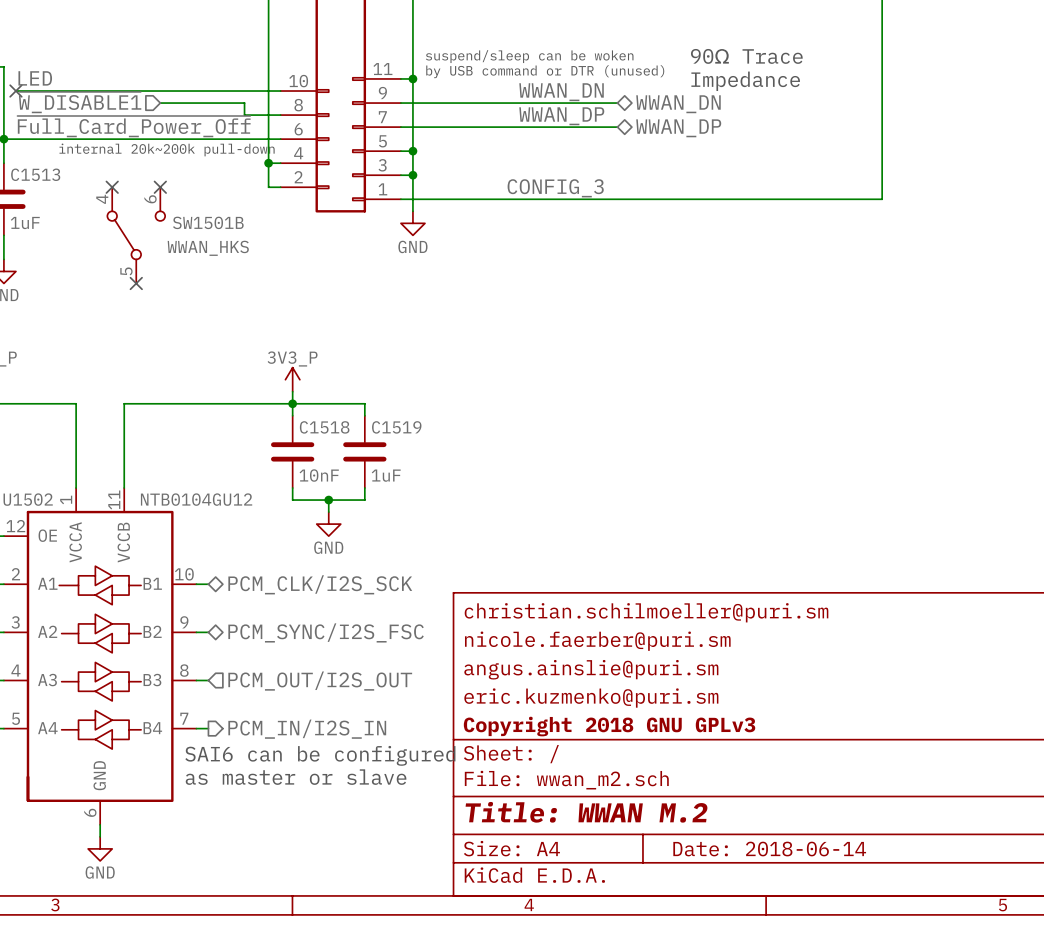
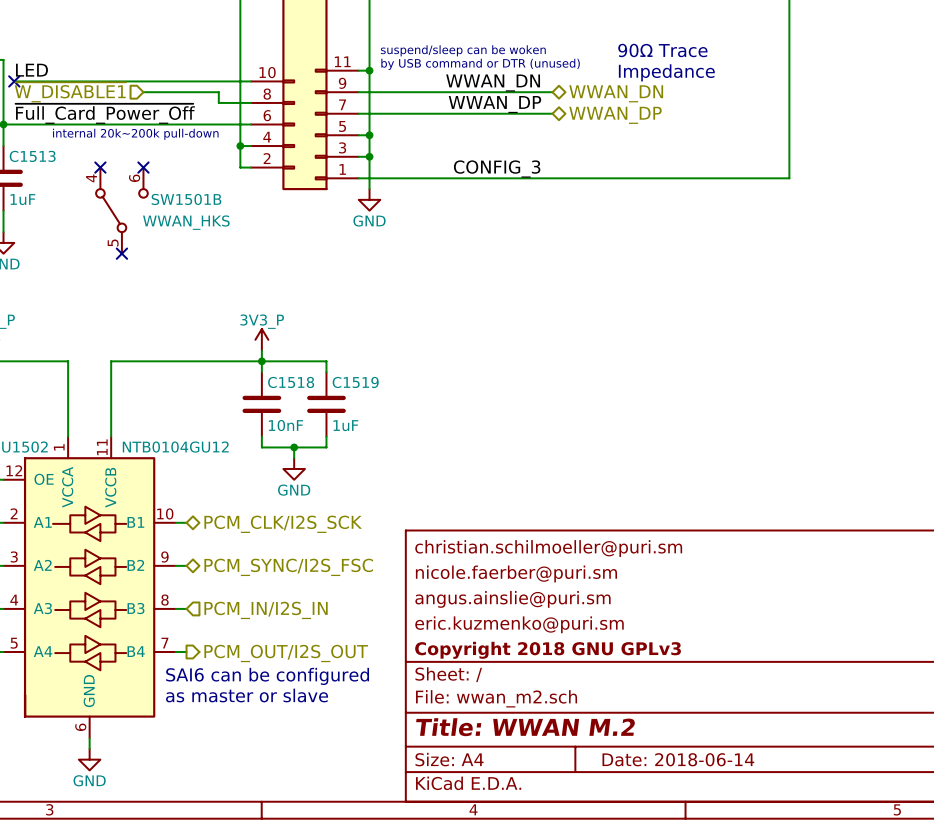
hierarchical label: PCM_OUT/I2S_OUT (320, 681) -> PCM_IN/I2S_IN (266, 610)
hierarchical label: PCM_IN/I2S_IN (307, 729) -> PCM_OUT/I2S_OUT (286, 653)

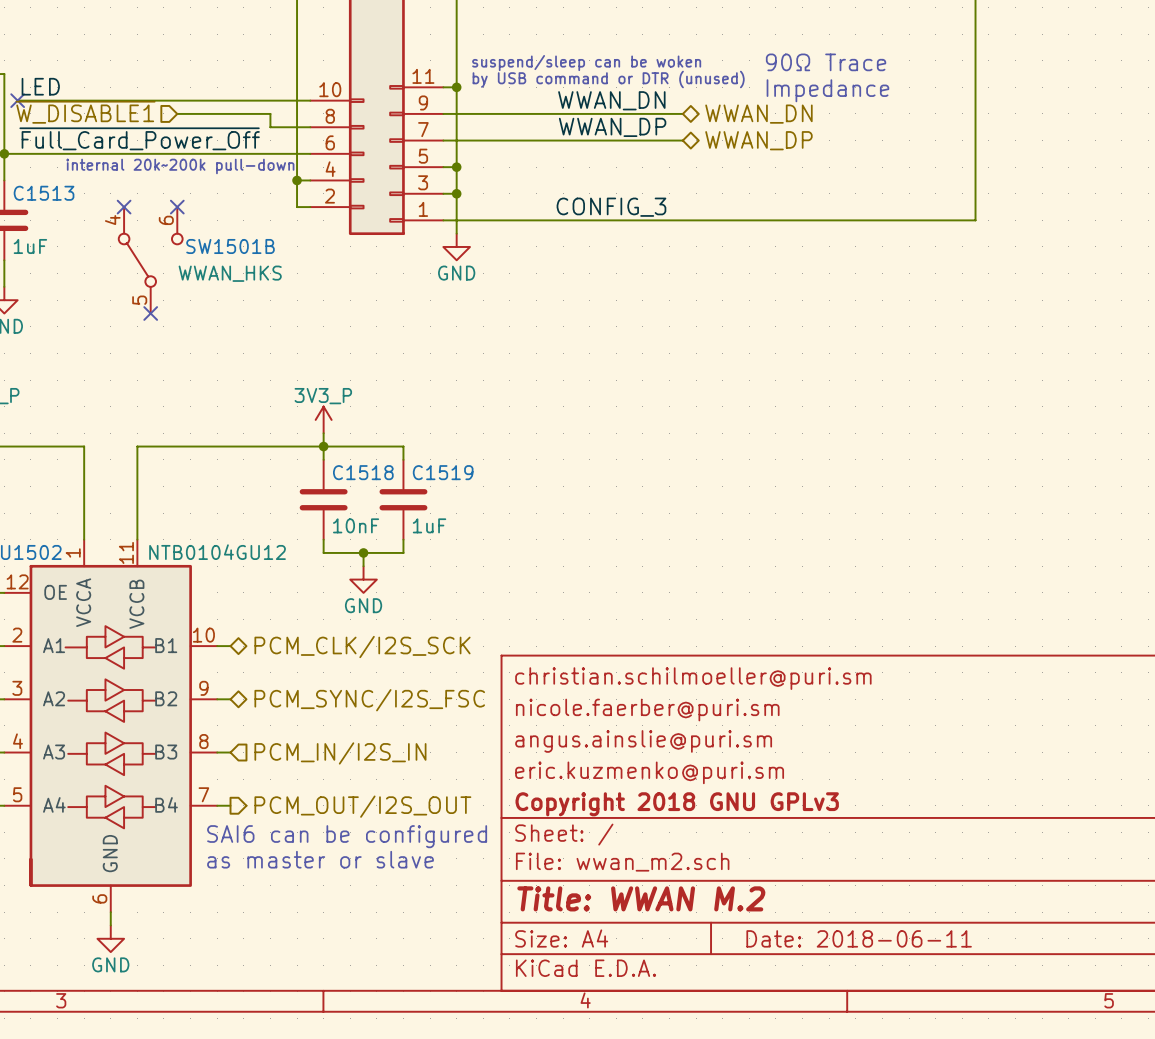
title block: Date: 2018-06-14 (678, 759) -> Date: 2018-06-11 (859, 938)

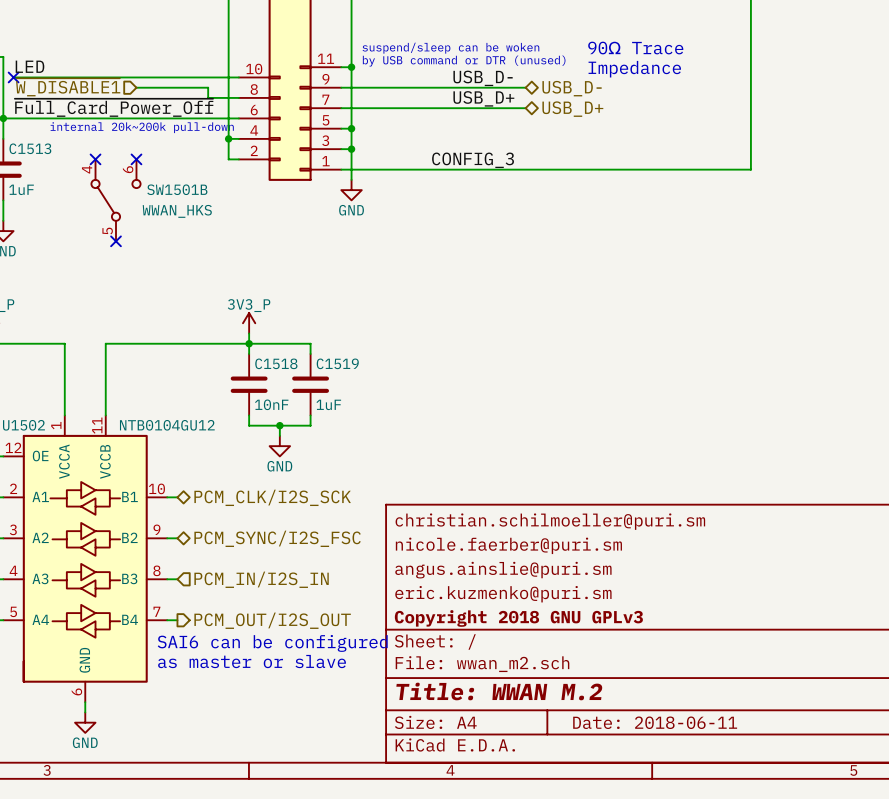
label: WWAN_DN (611, 100) -> USB_D- (483, 78)
hierarchical label: WWAN_DN (758, 114) -> USB_D- (572, 88)
label: WWAN_DP (612, 127) -> USB_D+ (483, 98)
hierarchical label: WWAN_DP (758, 140) -> USB_D+ (572, 109)

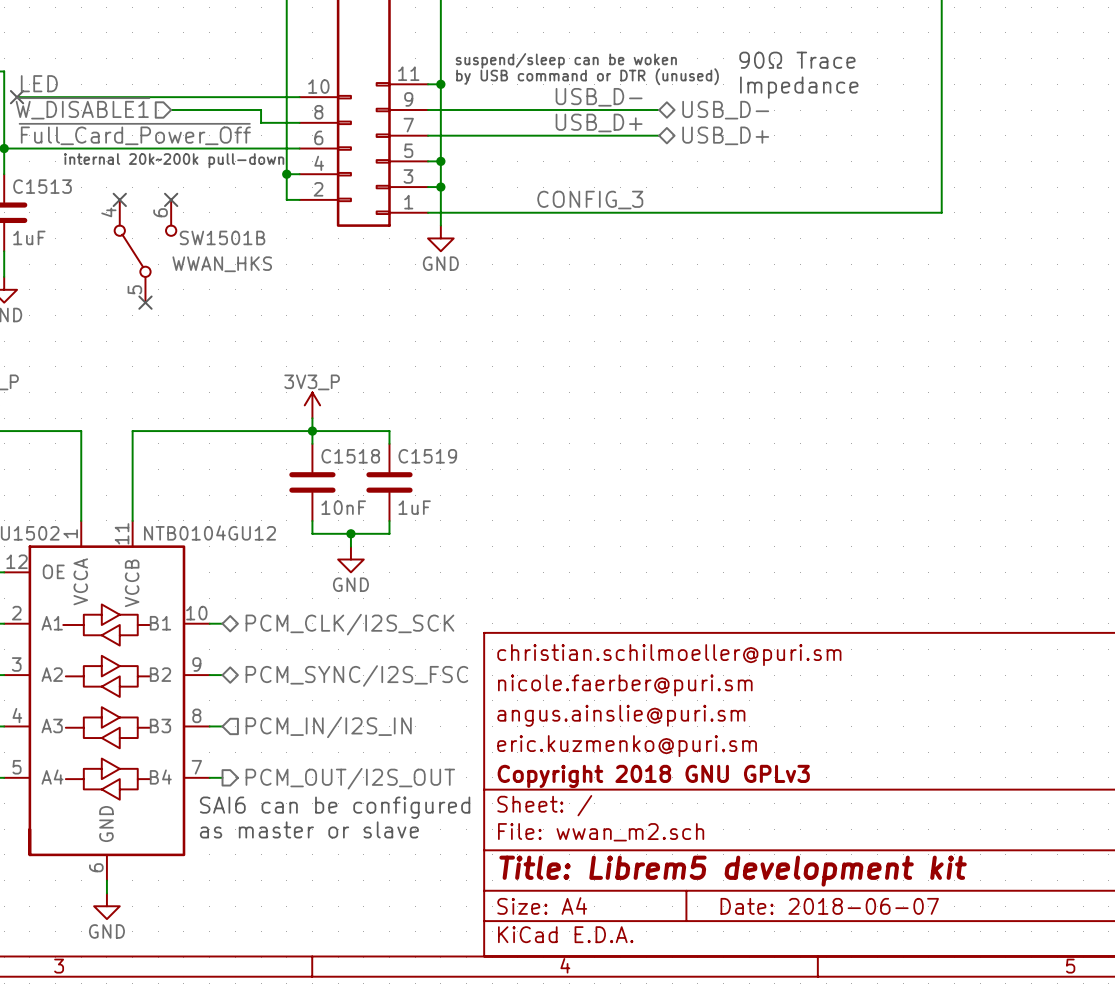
title block: Title: WWAN M.2 (499, 691) -> Title: Librem5 development kit (733, 871)
title block: Date: 2018-06-11 (655, 722) -> Date: 2018-06-07 (829, 906)

